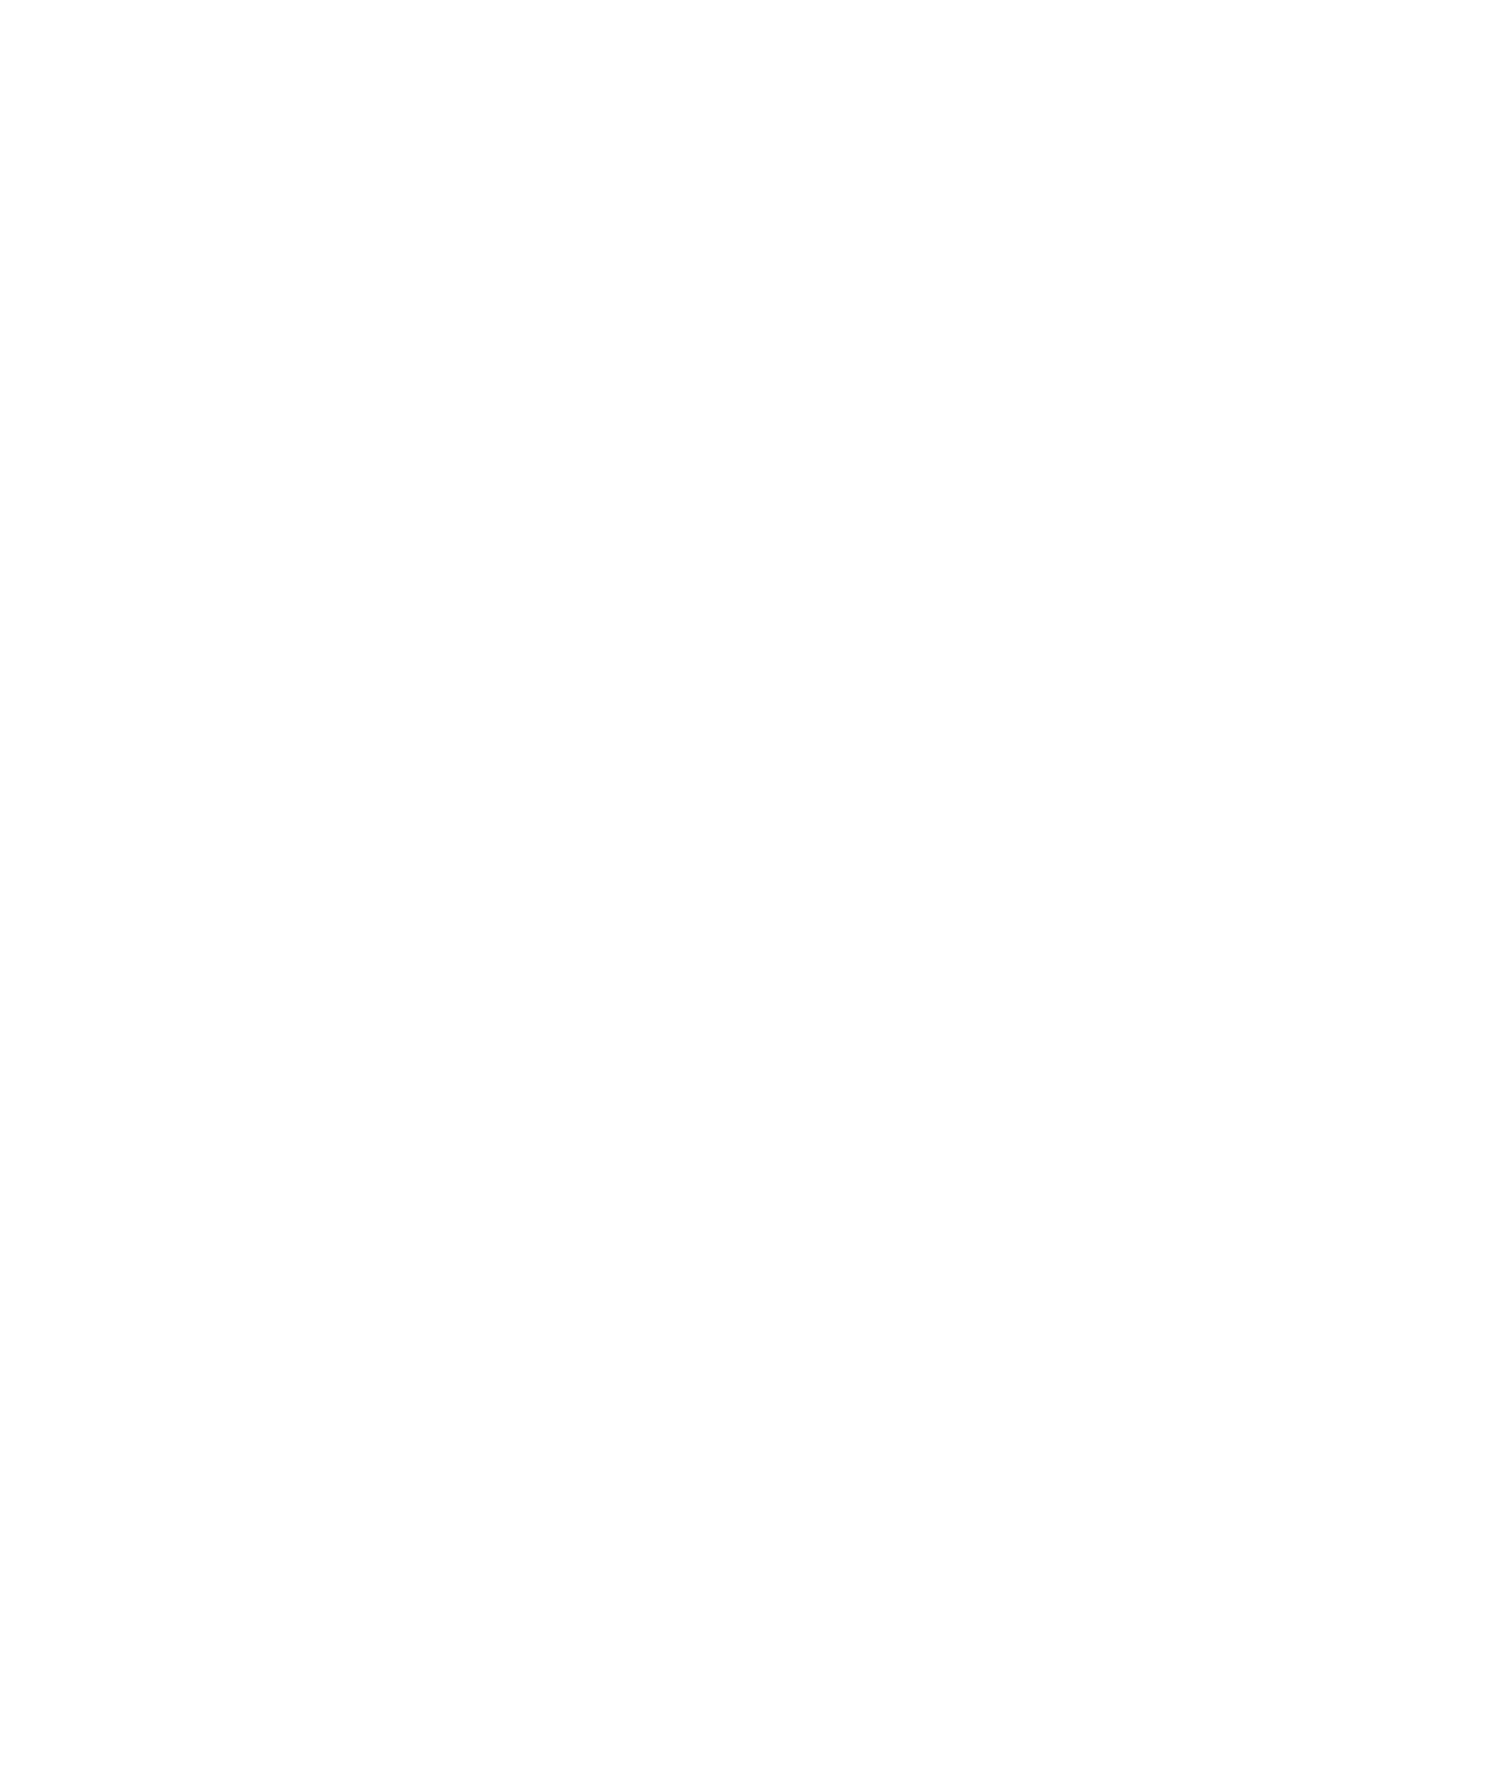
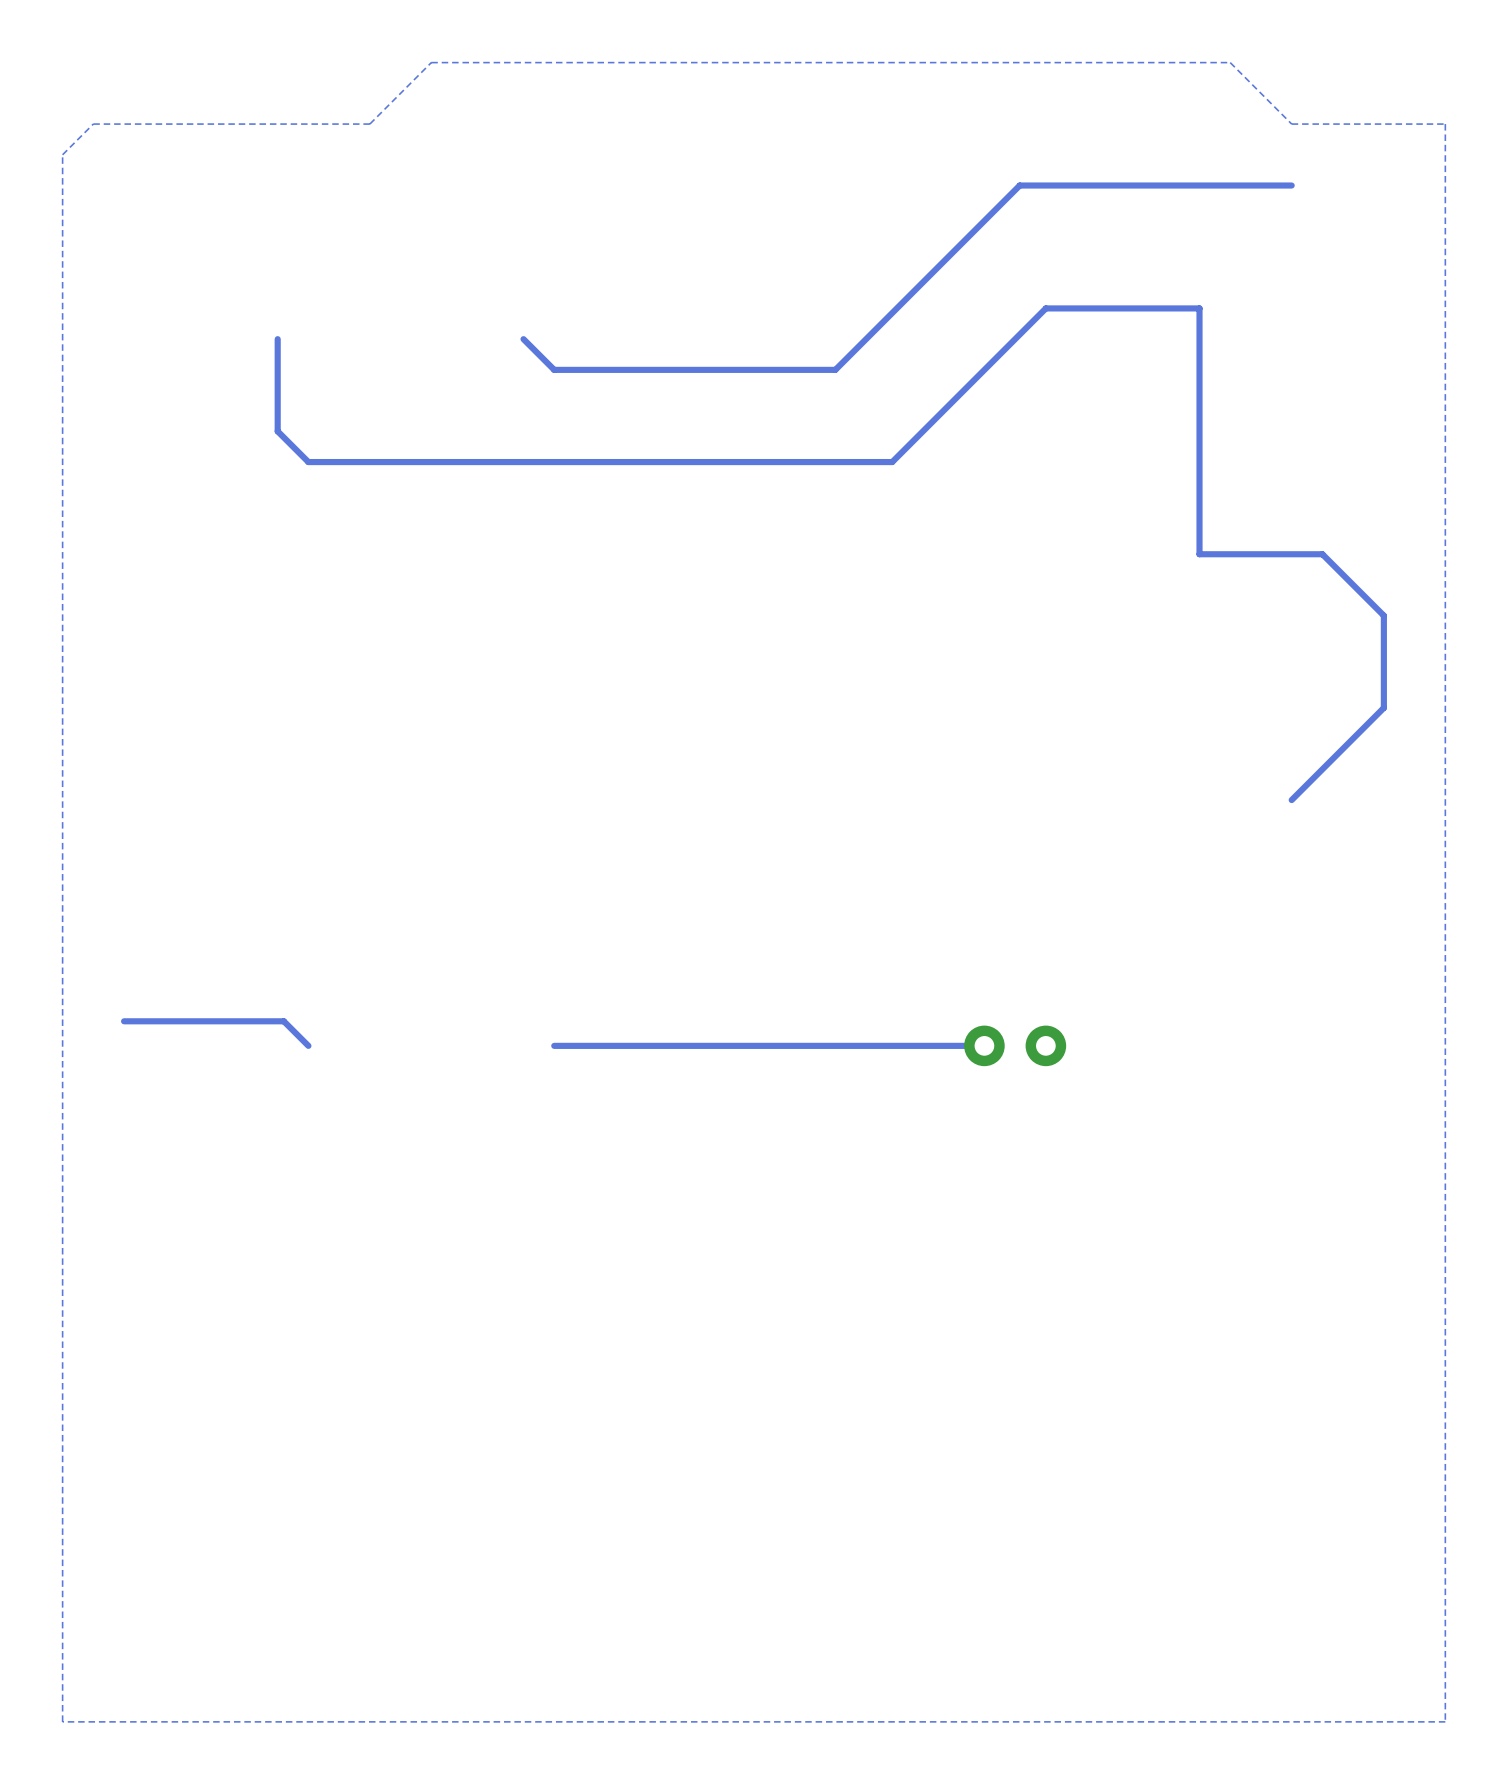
bottom zone outline: none -> (431, 62) (369, 124) (93, 124) (62, 154) (62, 1721) (1445, 1721) (1445, 124) (1291, 124) (1230, 62) (431, 62)
bottom track: none -> (1291, 185) (1019, 185) (835, 369) (554, 369) (523, 339)
bottom track: none -> (277, 339) (277, 431) (308, 462) (892, 462) (1045, 308) (1199, 308) (1199, 554) (1322, 554) (1383, 615) (1383, 707) (1291, 800)
bottom track: none -> (124, 1021) (283, 1021) (308, 1045)
bottom track: none -> (554, 1045) (984, 1045)
part: none -> (1015, 1045)

